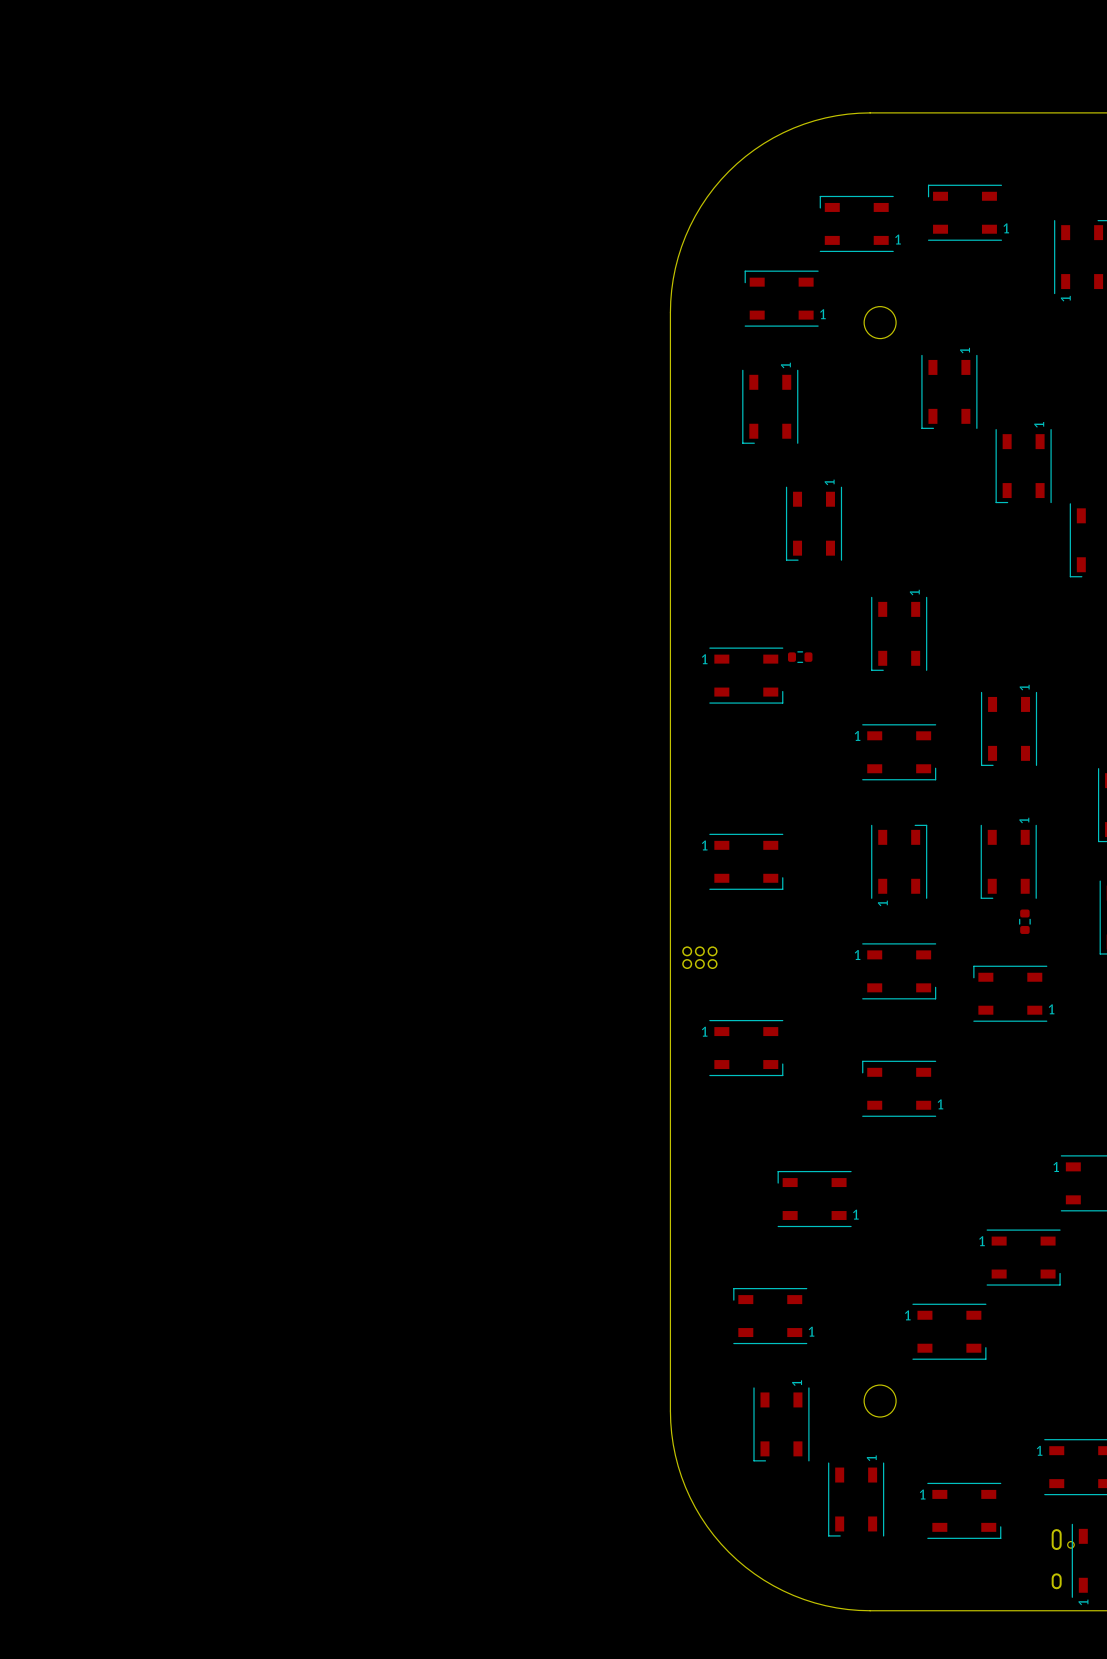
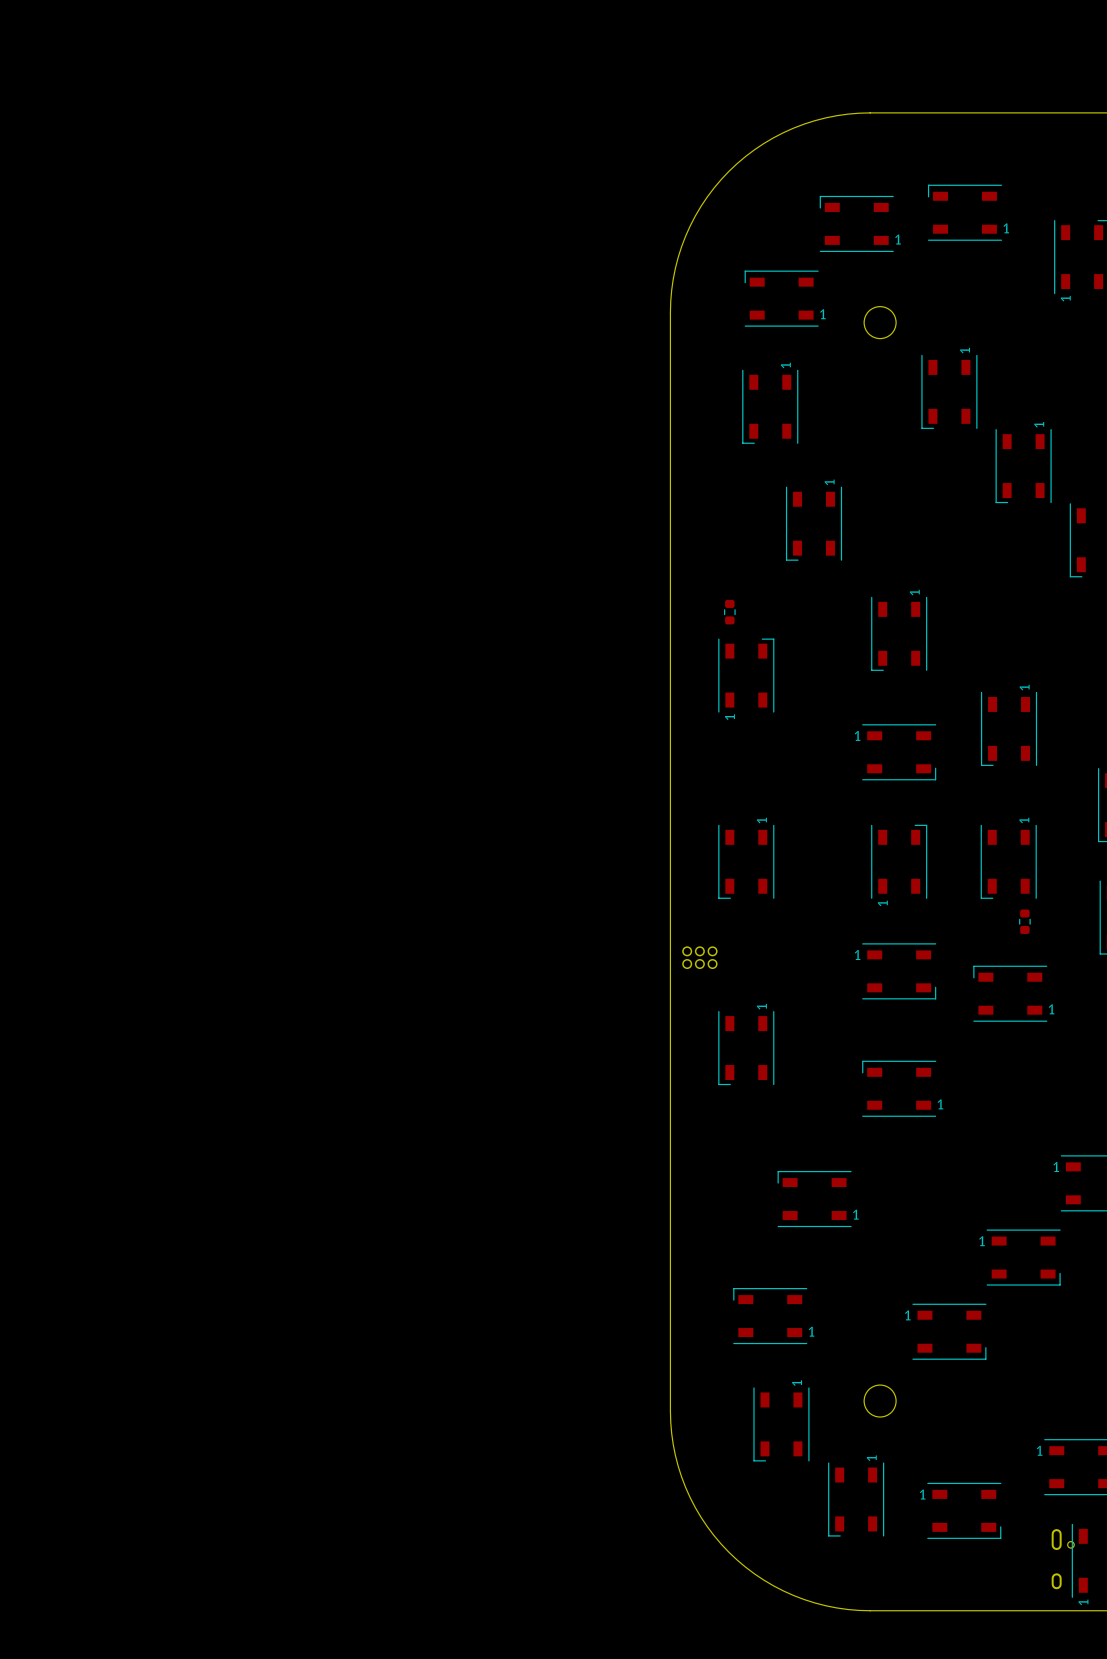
part rotation: 0° (800, 657) -> 90° clockwise (729, 612)
part position: (800, 657) -> (729, 612)
part rotation: 0° (746, 675) -> 90° counterclockwise (746, 675)
part rotation: 0° (746, 861) -> 90° clockwise (746, 861)
part rotation: 0° (746, 1048) -> 90° clockwise (746, 1048)

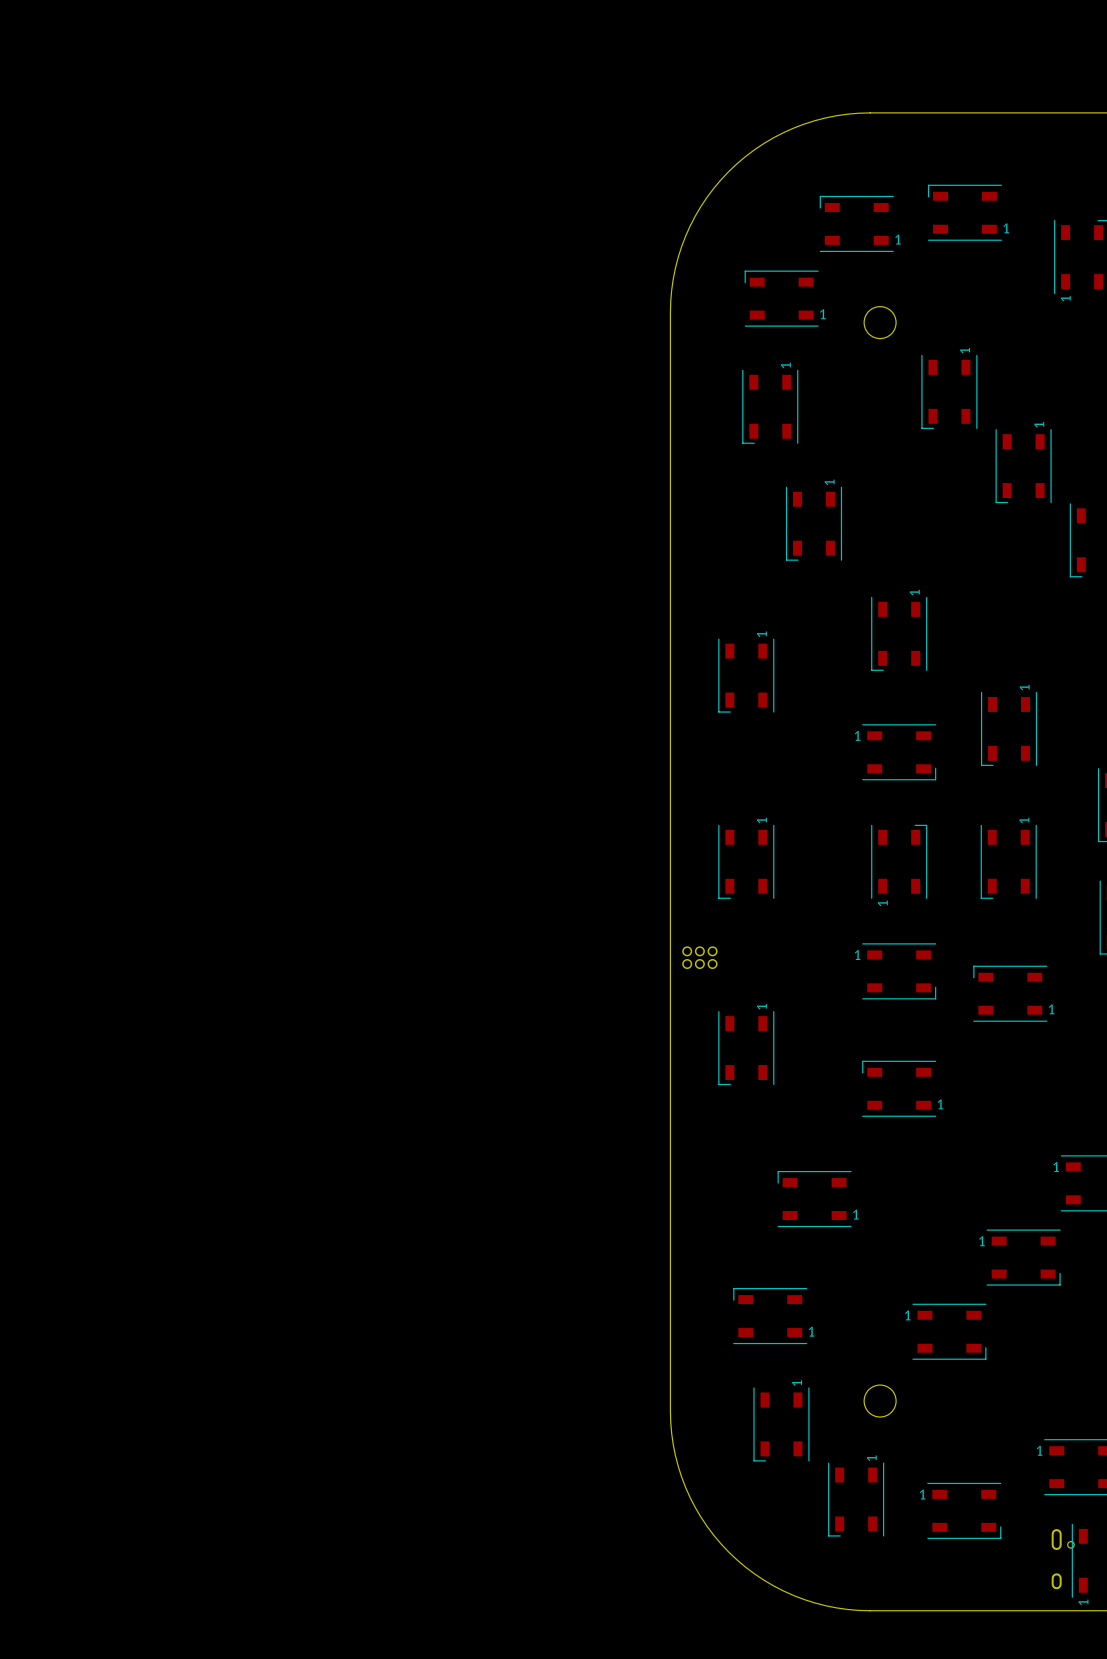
part: (729, 612) -> none
part rotation: 0° (746, 675) -> 180° (746, 675)
part: (1024, 921) -> none

